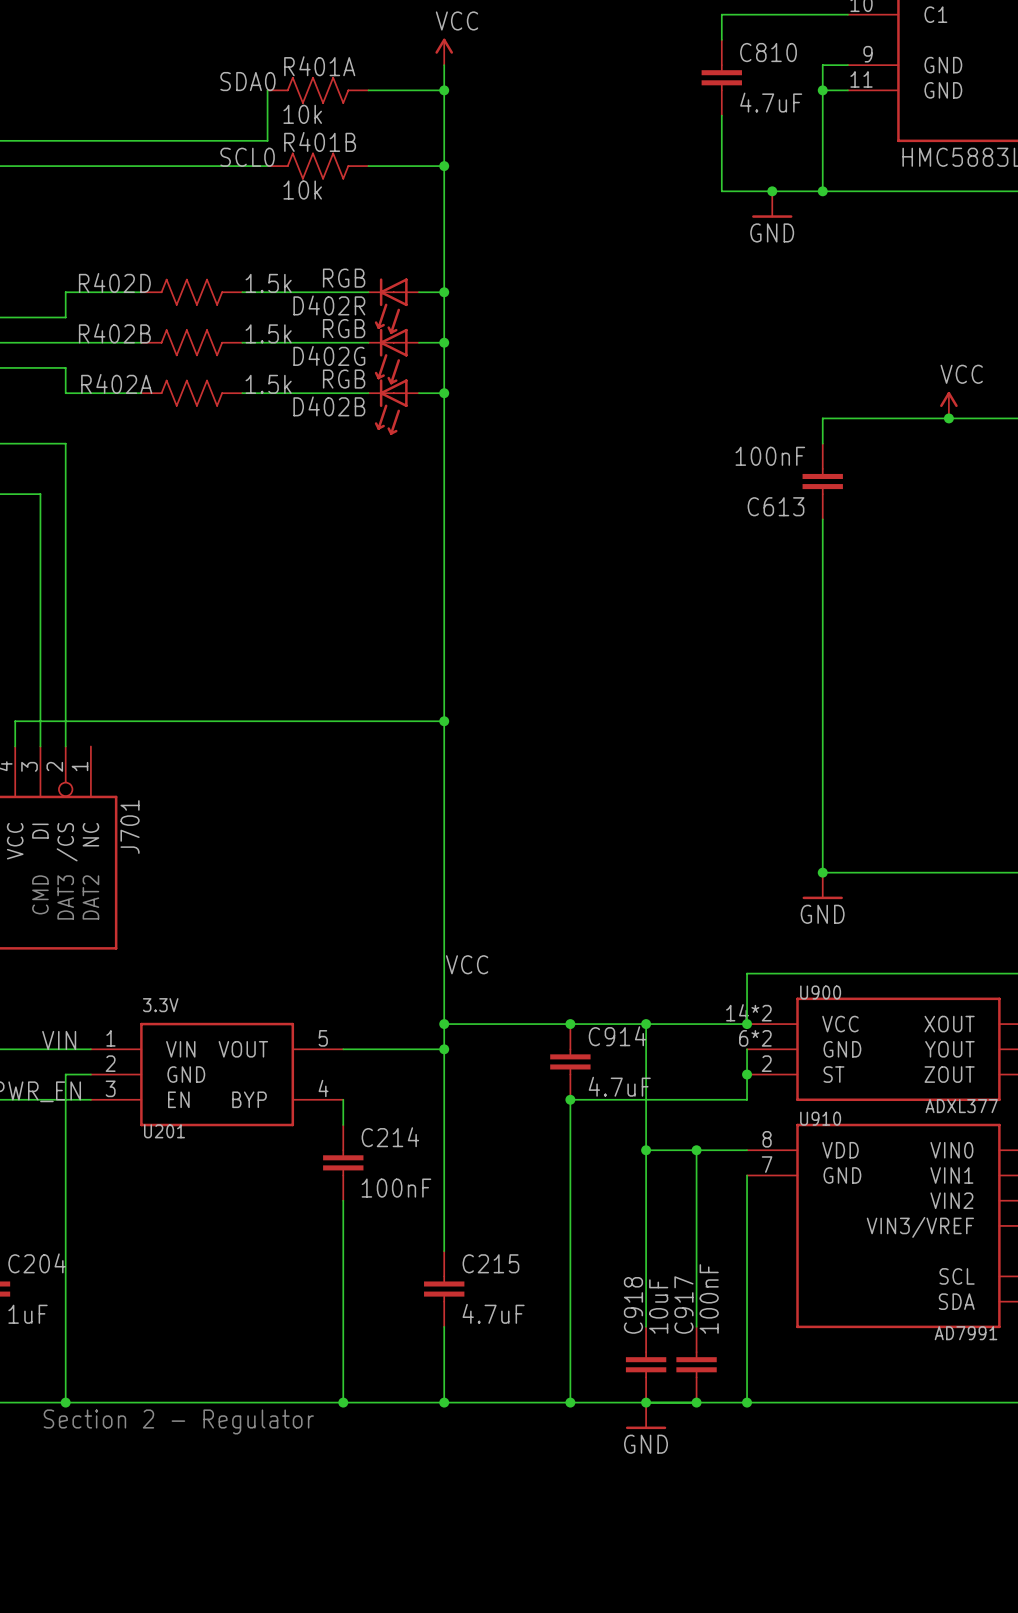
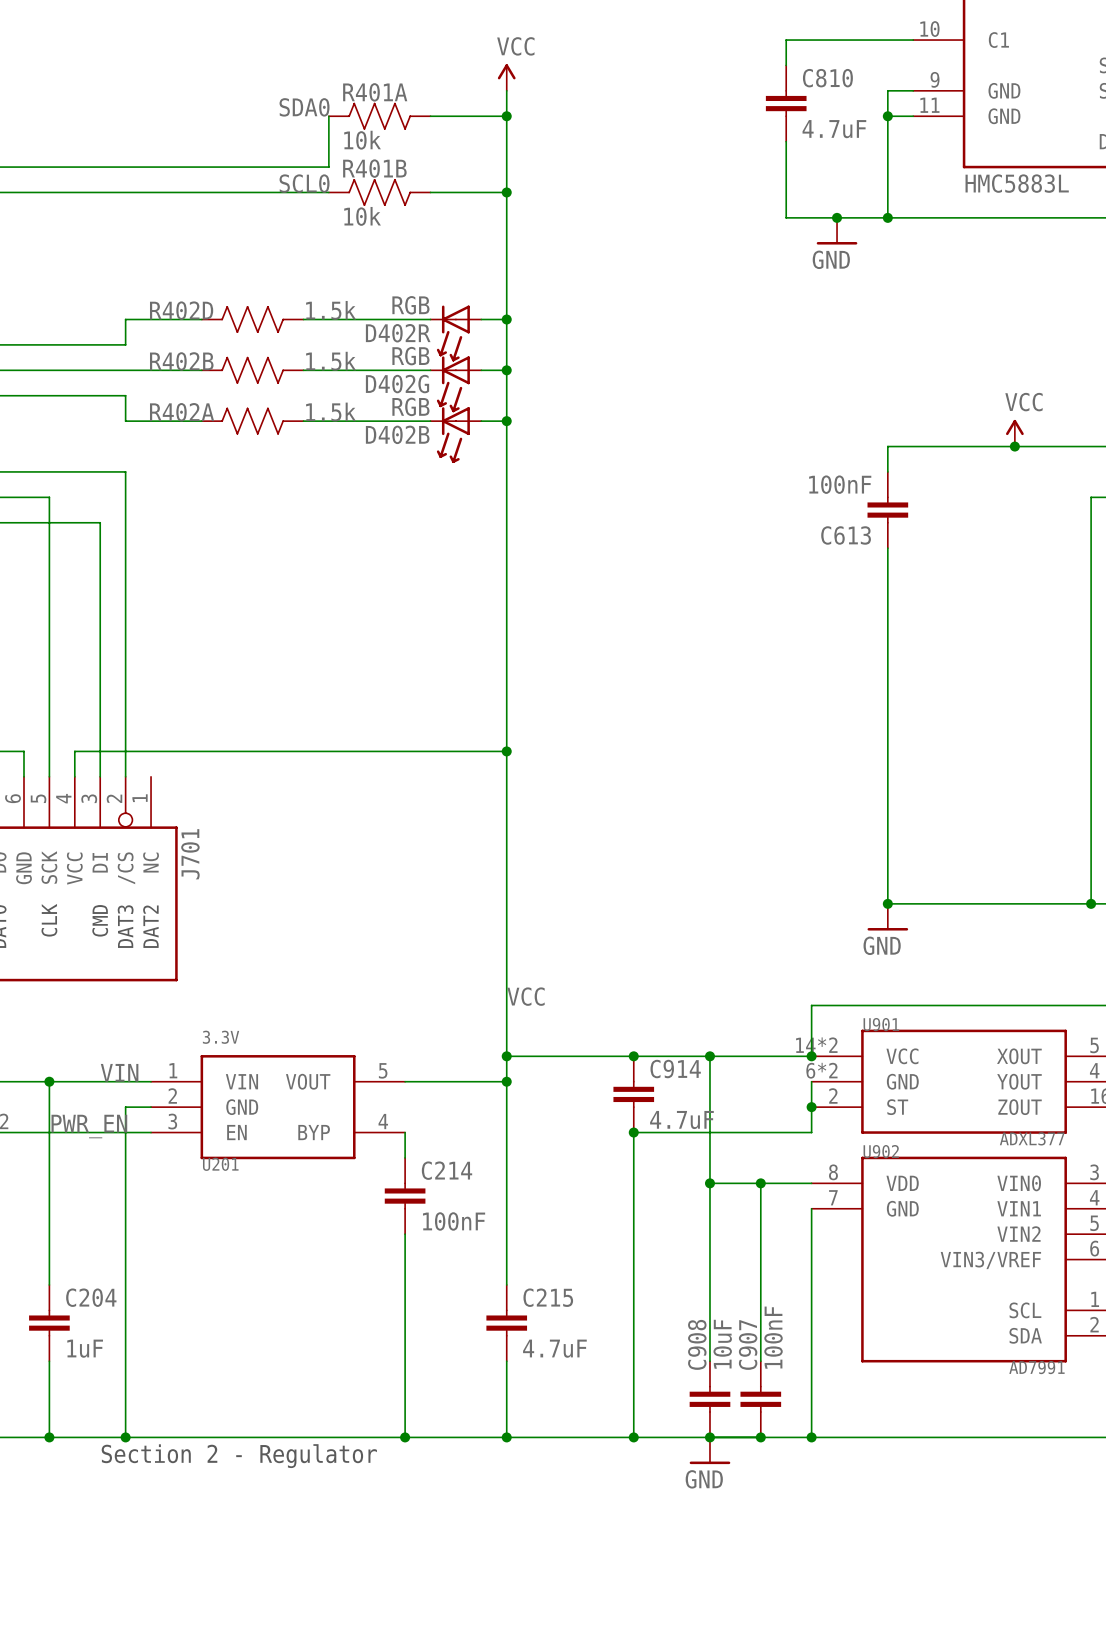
U900 name: U900 (820, 992) -> U901 (881, 1024)
U910 name: U910 (820, 1118) -> U902 (881, 1151)
C918 name: C918 (633, 1305) -> C908 (697, 1344)
C917 name: C917 (683, 1305) -> C907 (748, 1345)

